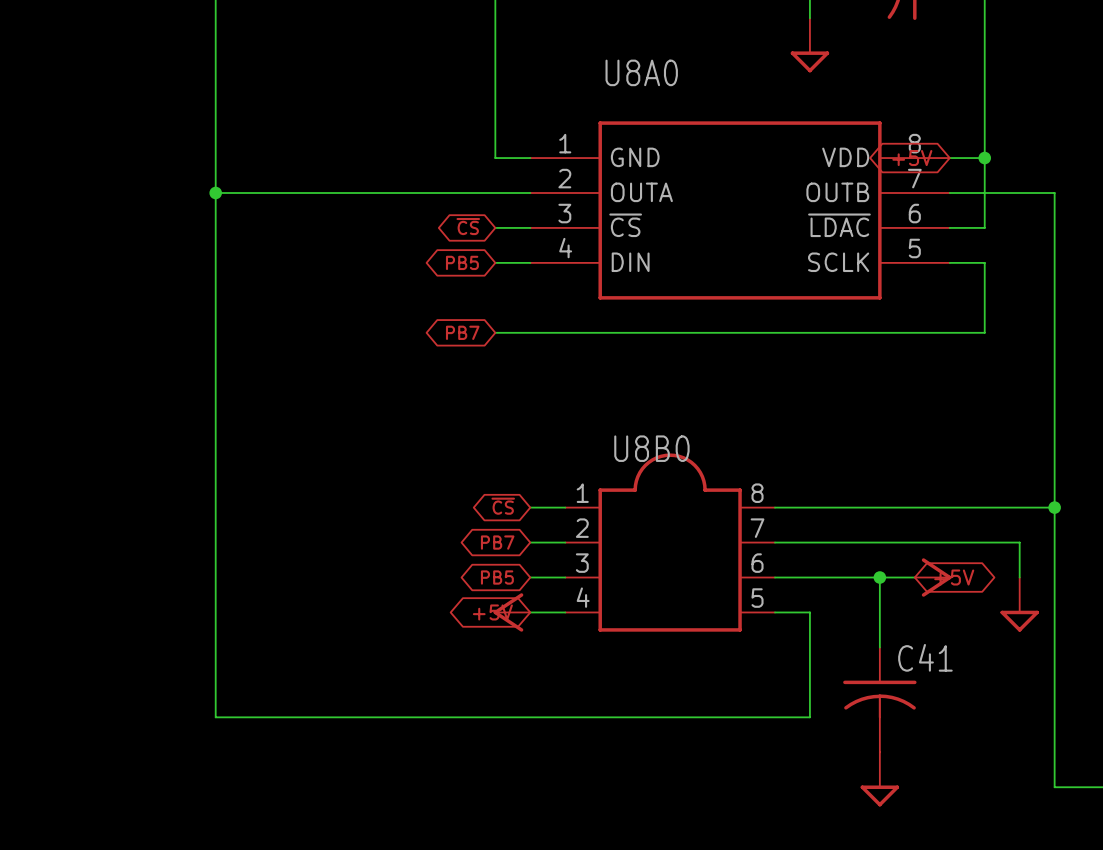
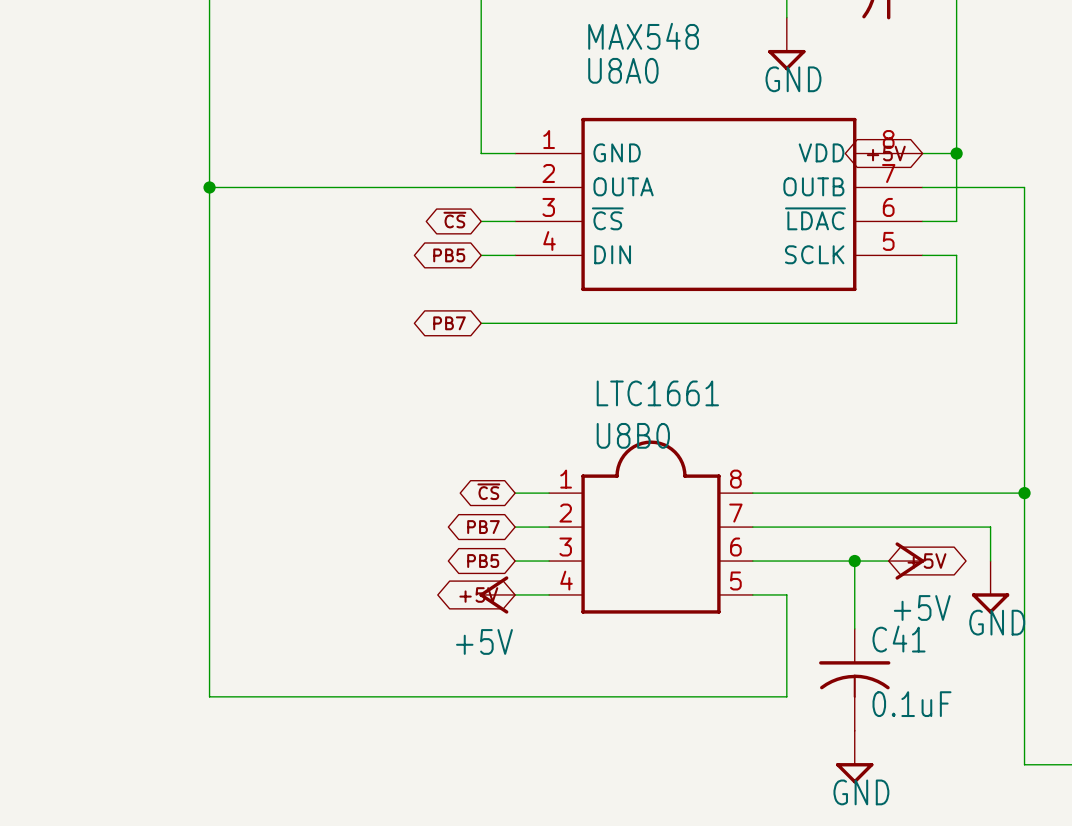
U8A0 value: none -> MAX548 (643, 36)
power symbol text: none -> GND (793, 79)
U8B0 value: none -> LTC1661 (657, 393)
power symbol text: none -> +5V (922, 607)
power symbol text: none -> GND (997, 622)
power symbol text: none -> +5V (484, 641)
C41 value: none -> 0.1uF (911, 704)
power symbol text: none -> GND (861, 792)

